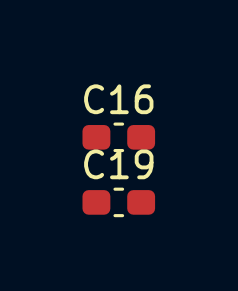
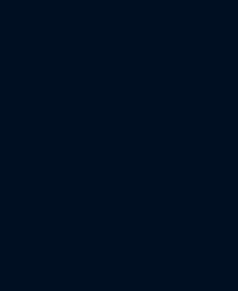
C16: (118, 137) -> none
C19: (118, 202) -> none

